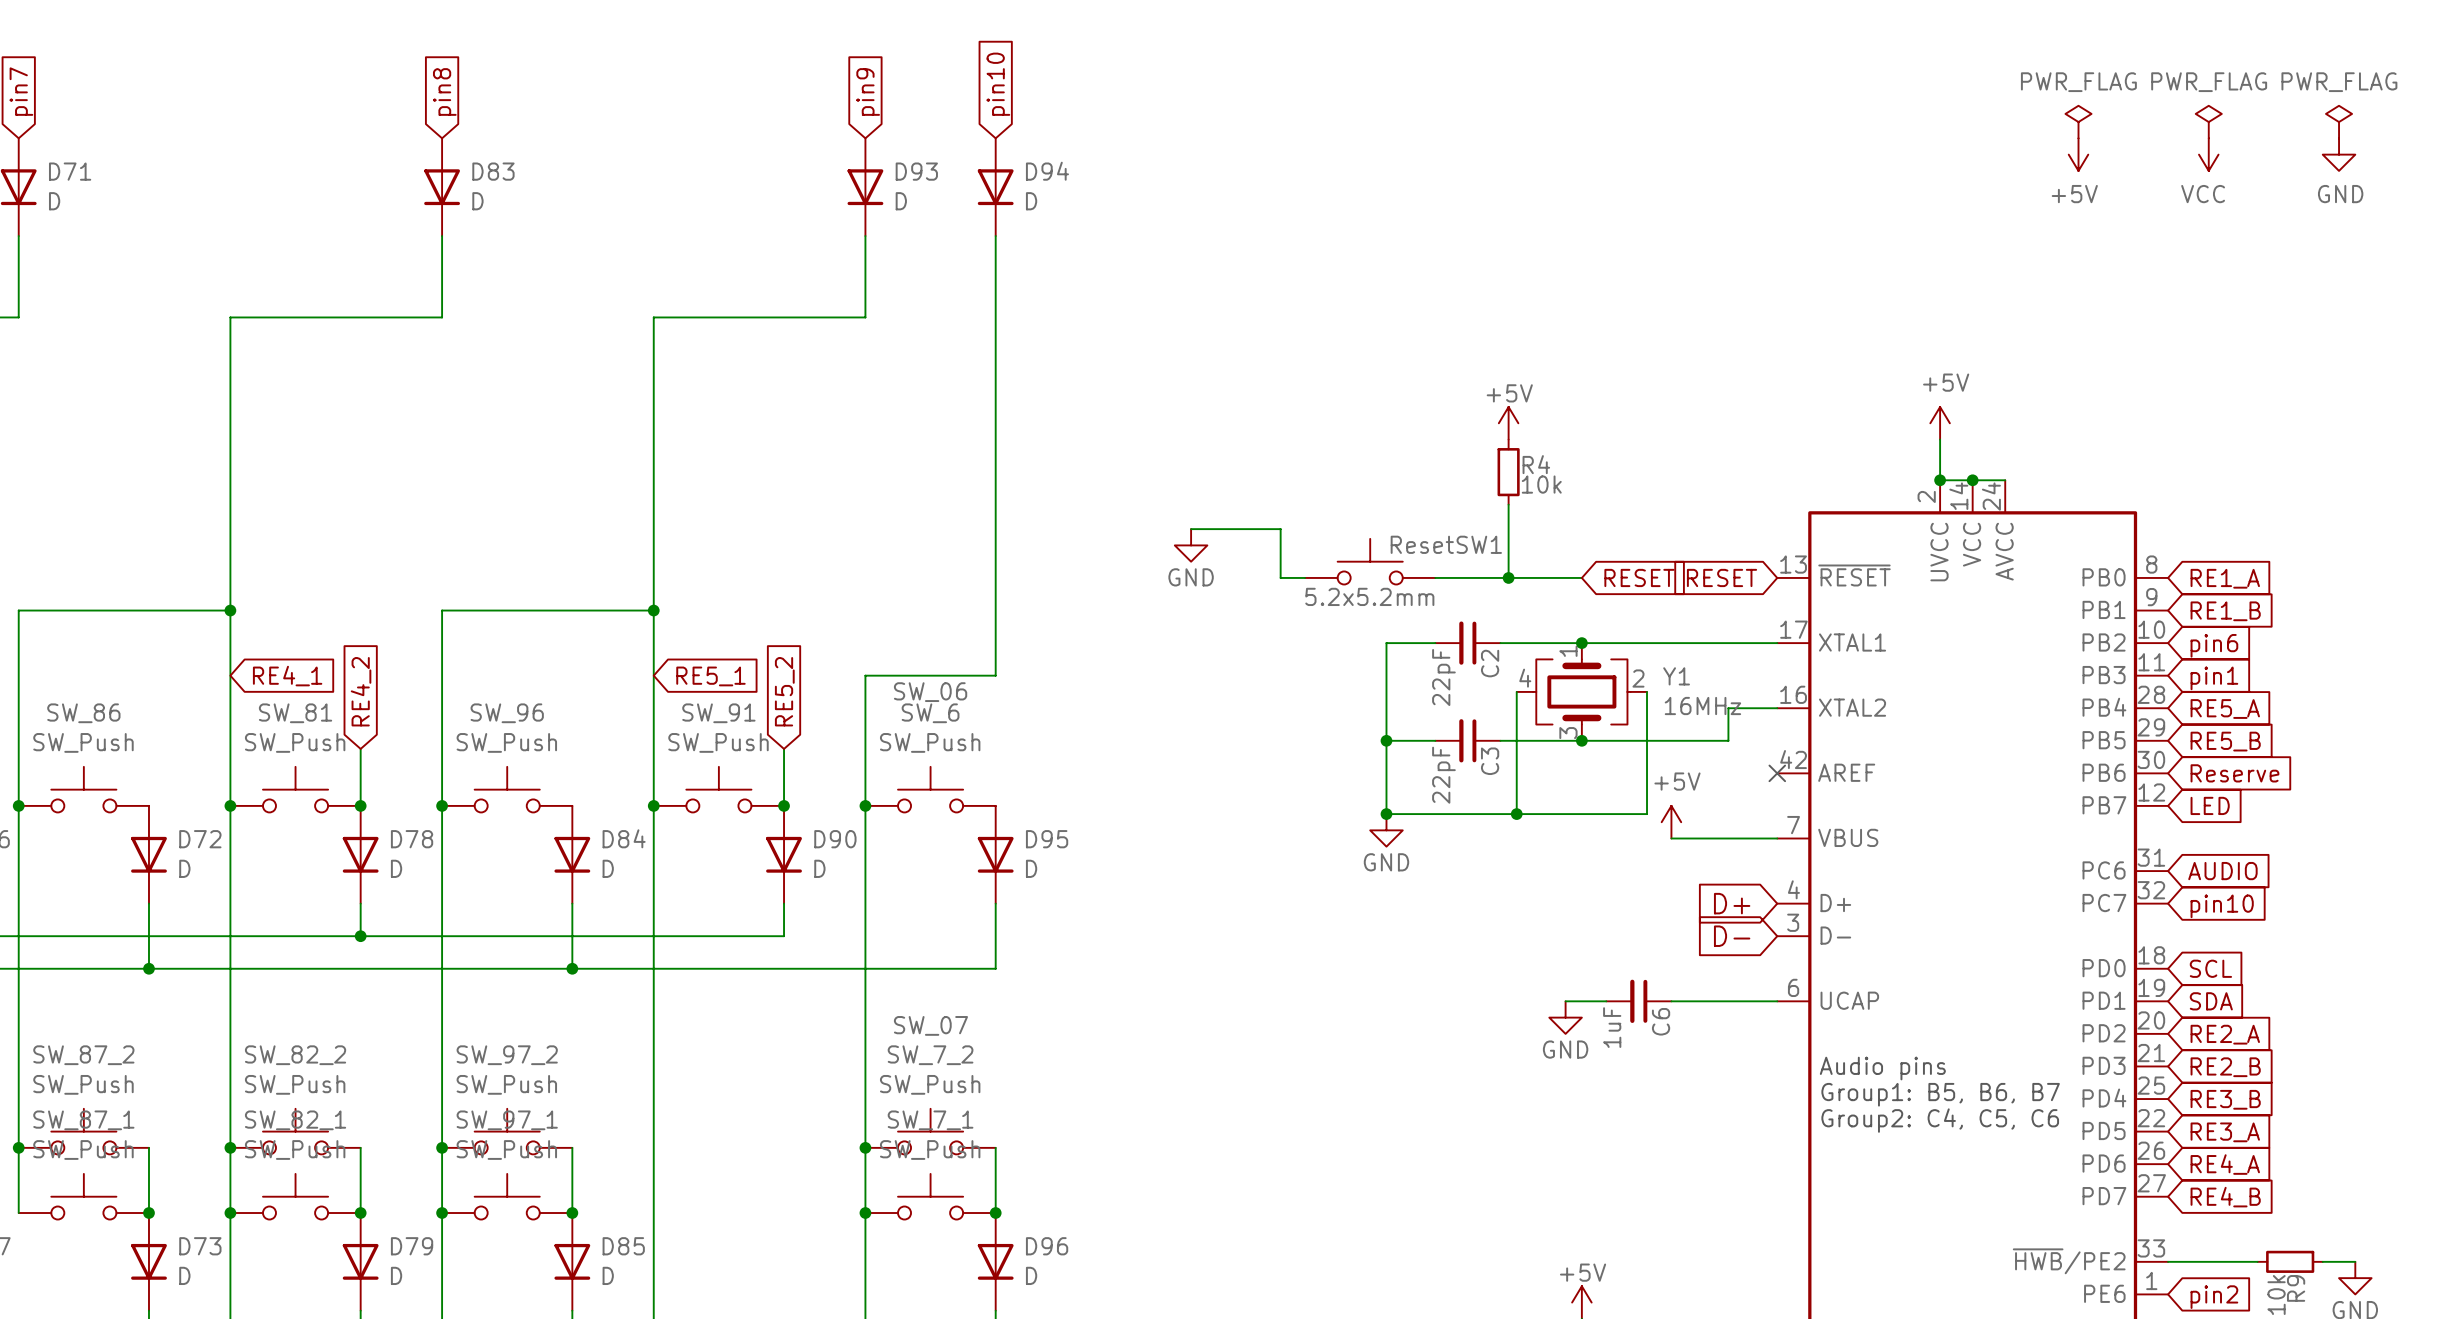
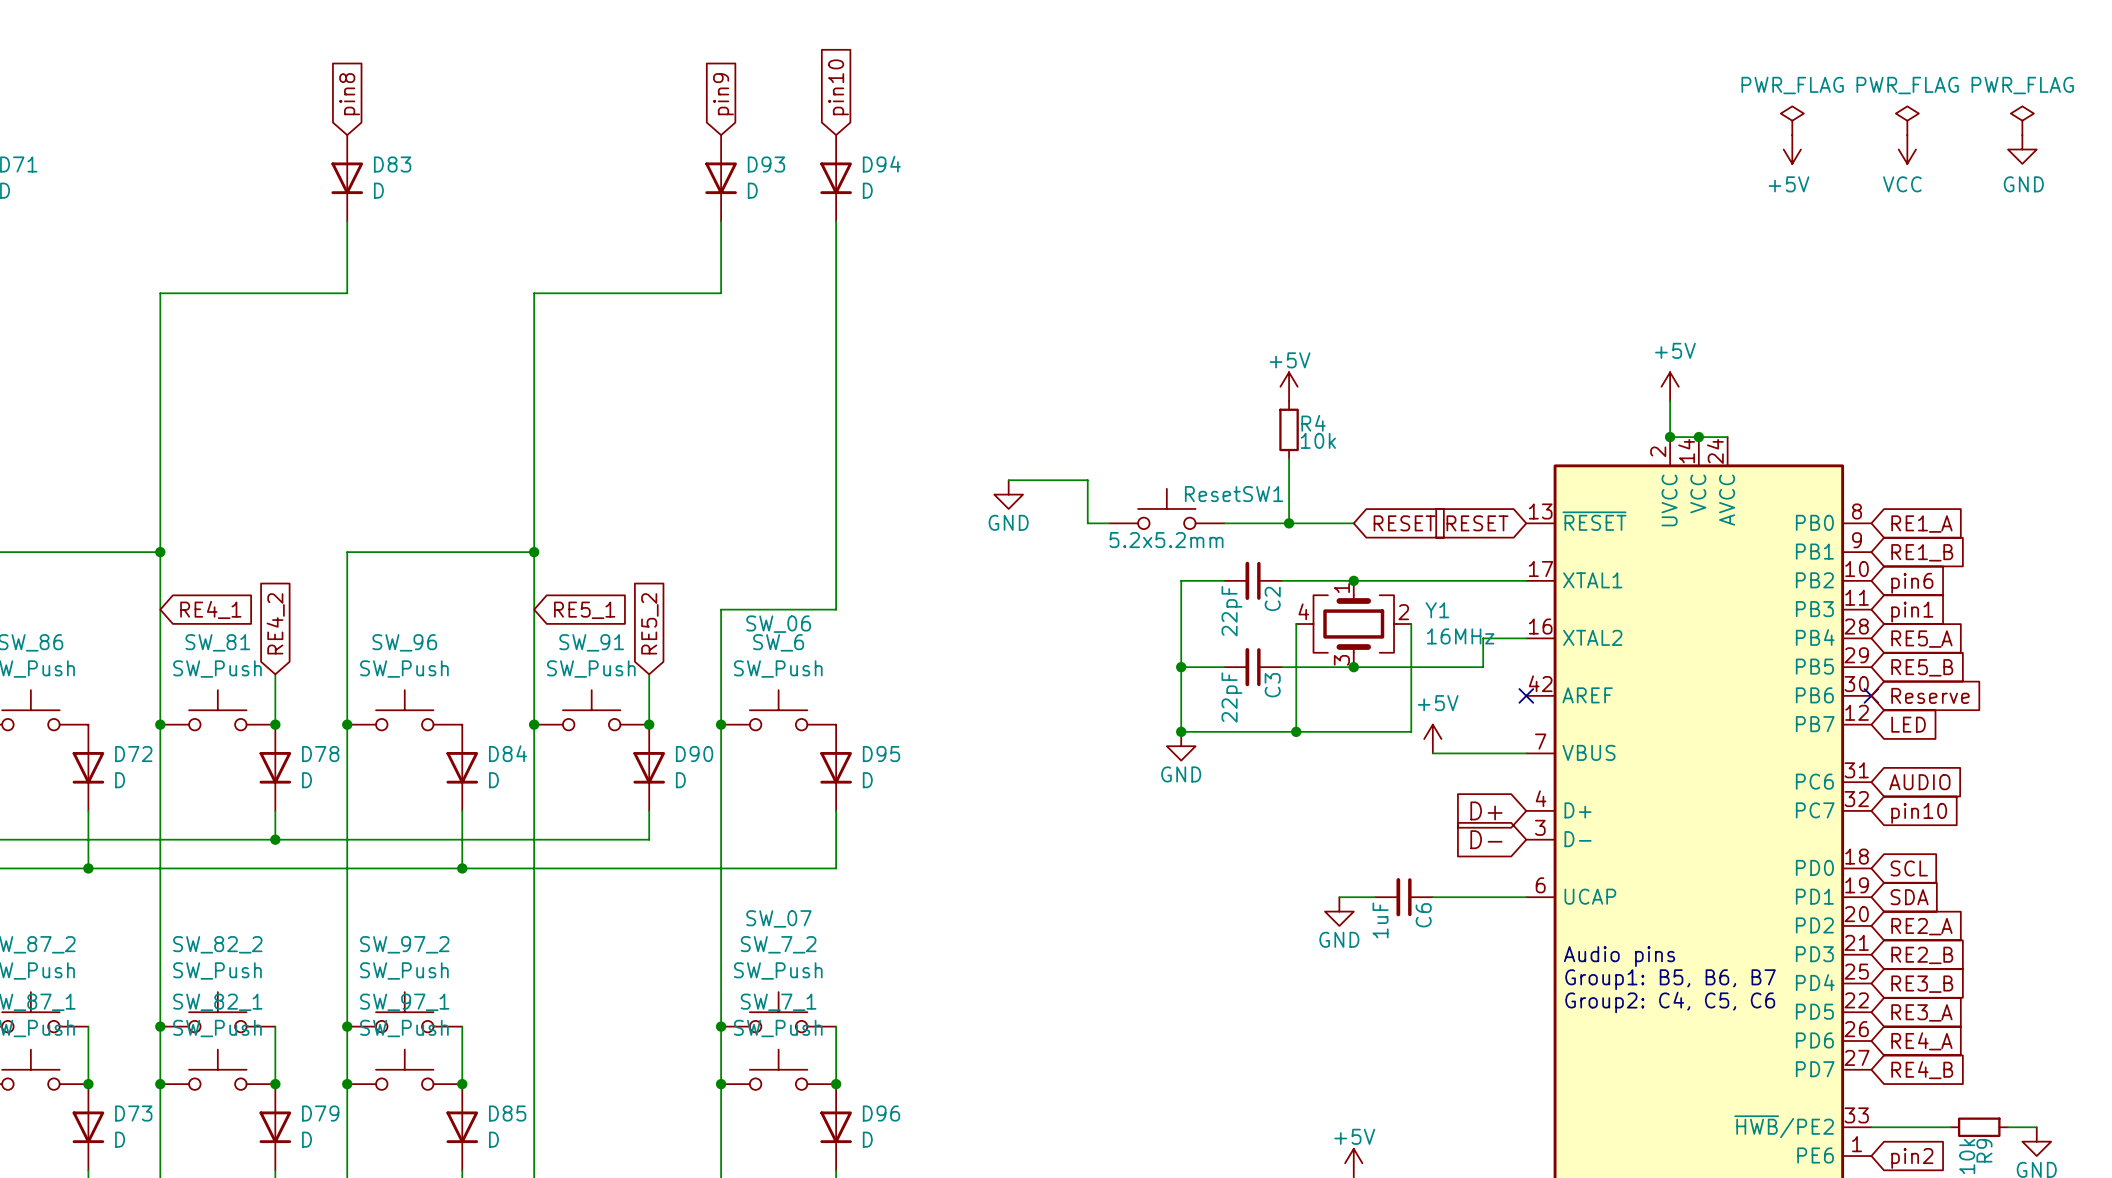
no-connect mark: none -> (1871, 695)

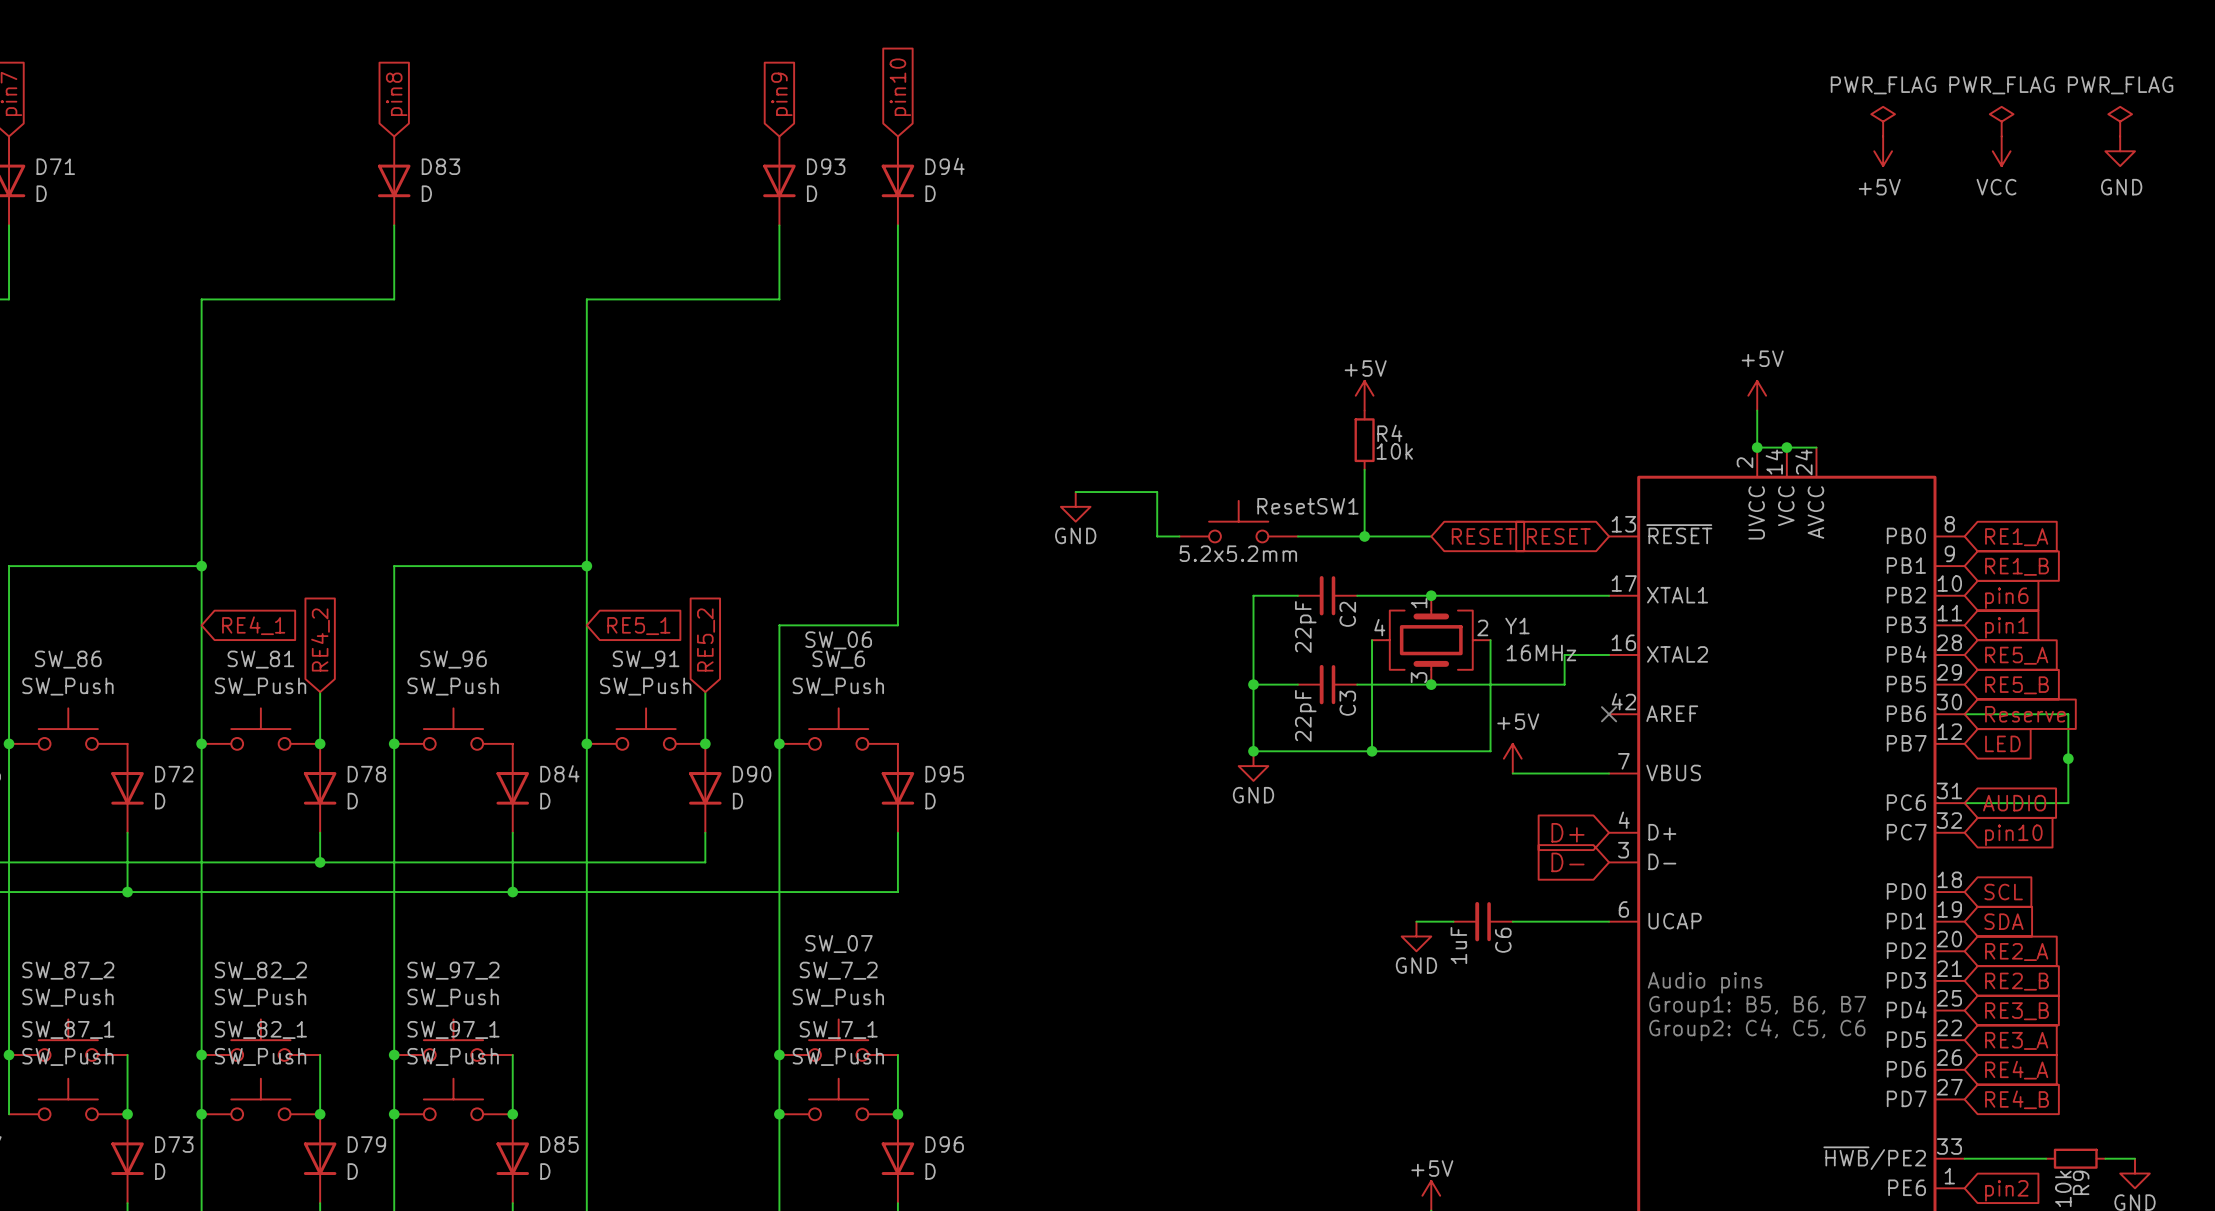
wire: none -> (1964, 714) (2068, 714) (2068, 803) (1964, 803)
no-connect mark: (1871, 695) -> none
junction: none -> (2068, 758)

